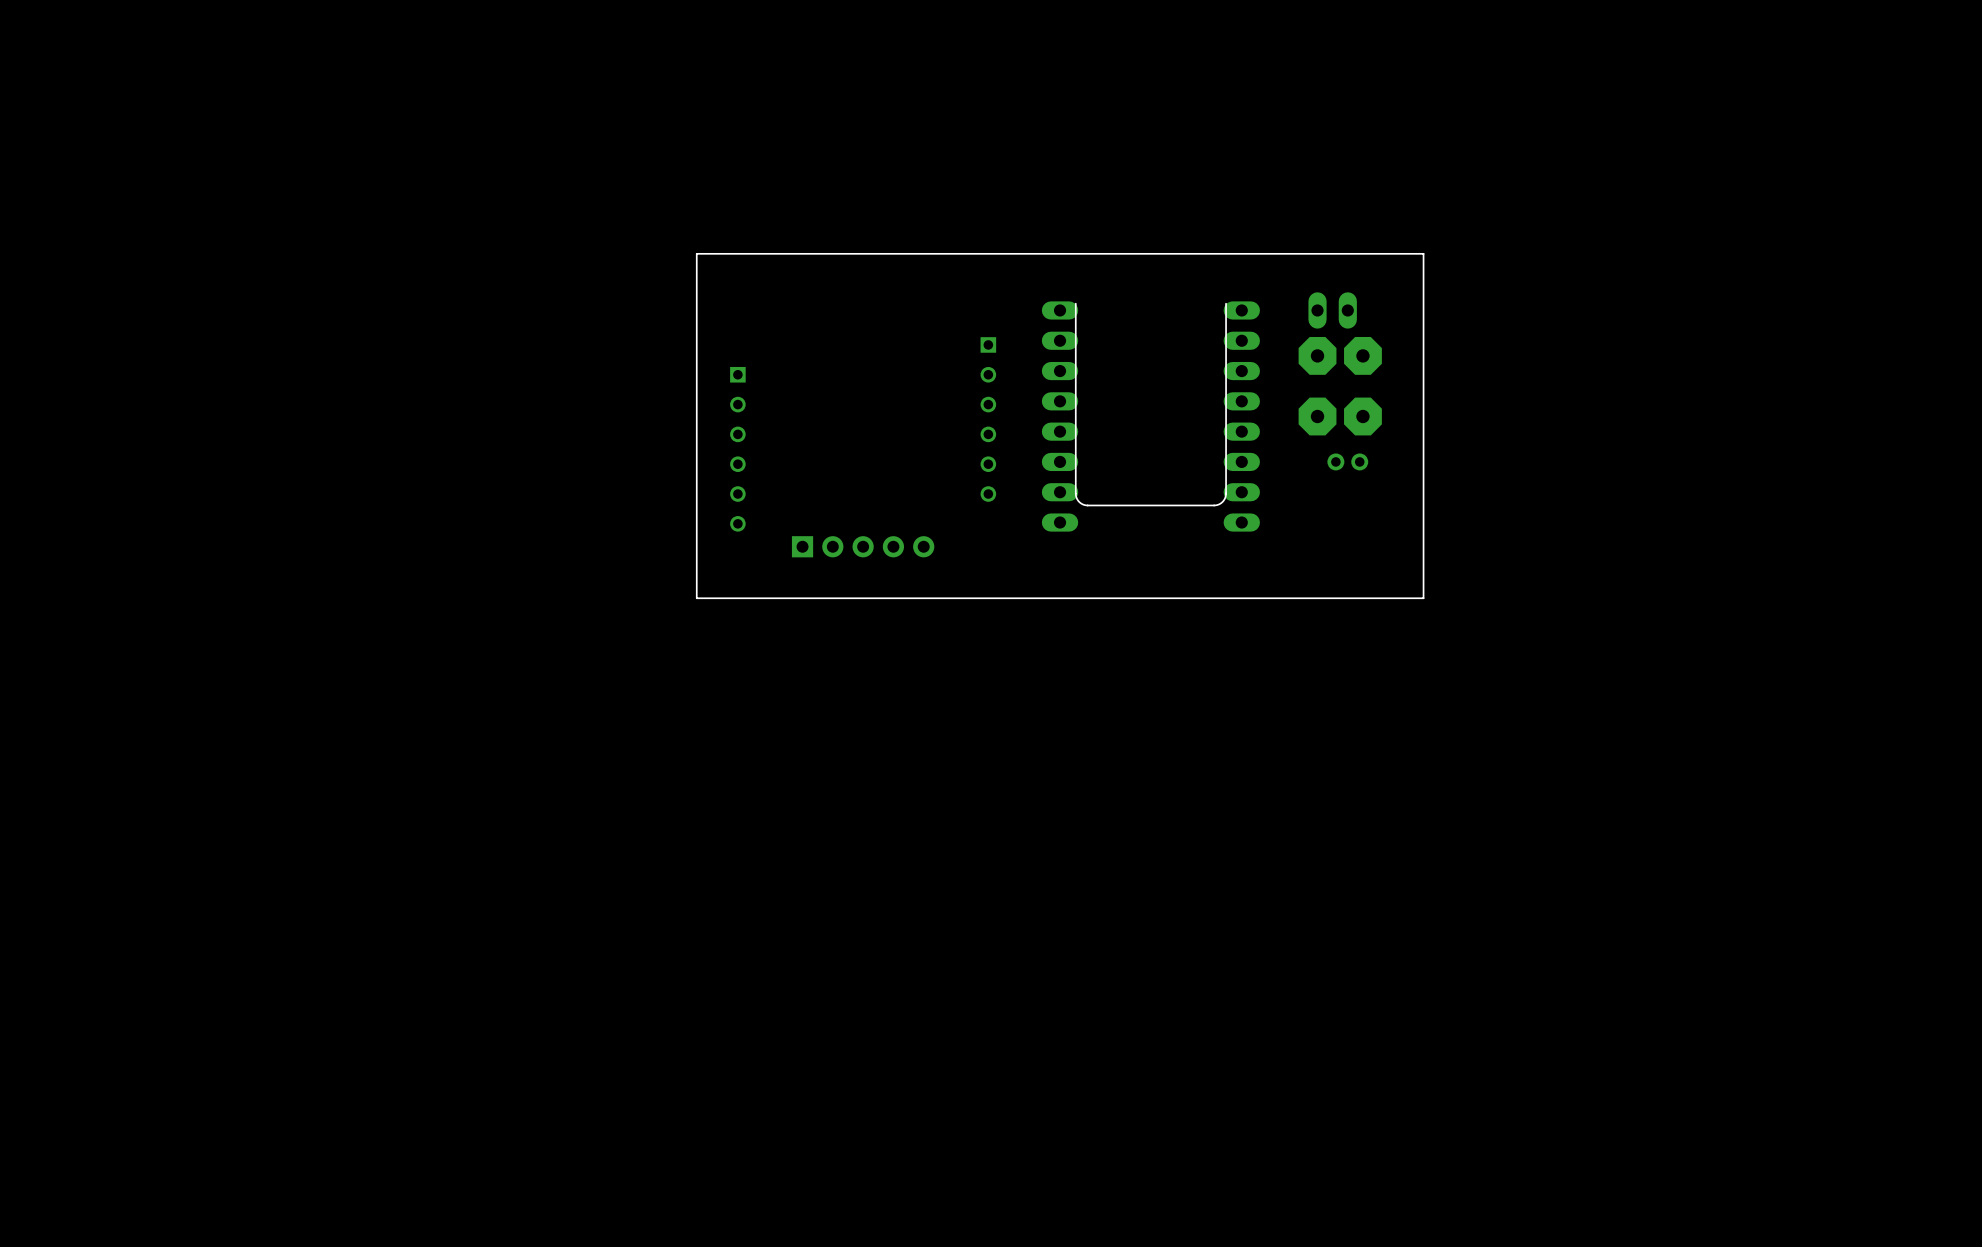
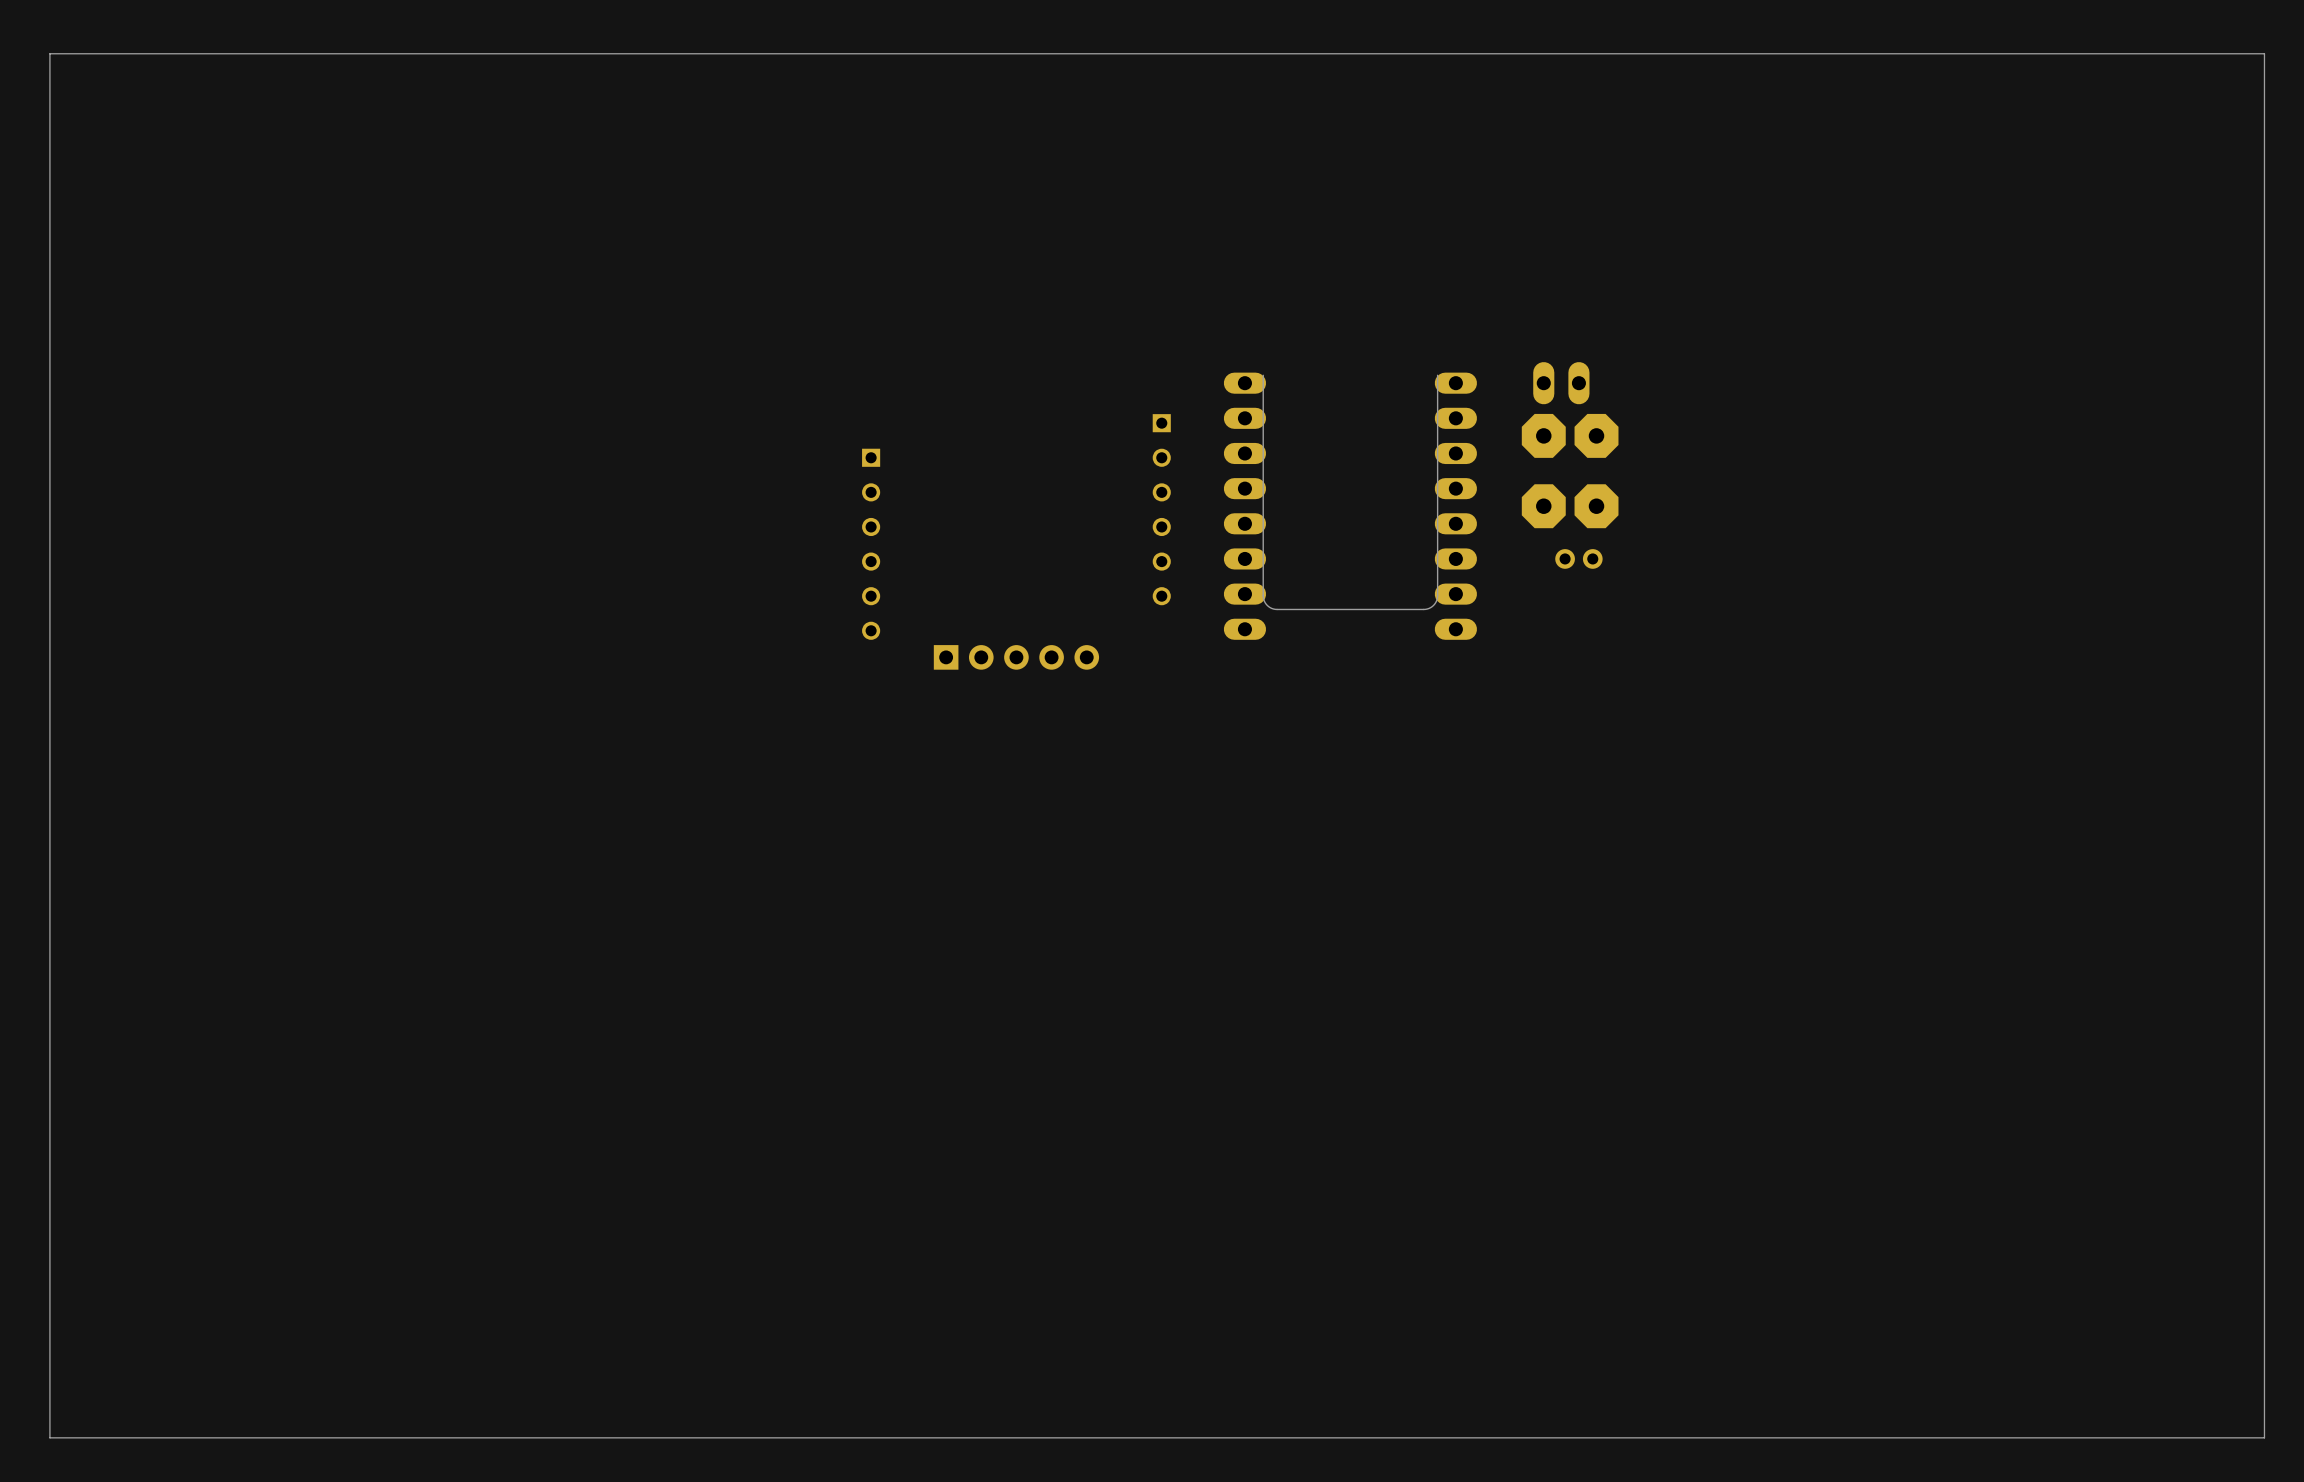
board edge: none -> (2264, 53) (49, 53) (49, 1437) (2264, 1437) (2264, 53)
board edge: (1423, 253) (696, 253) (696, 598) (1423, 598) (1423, 253) -> none

